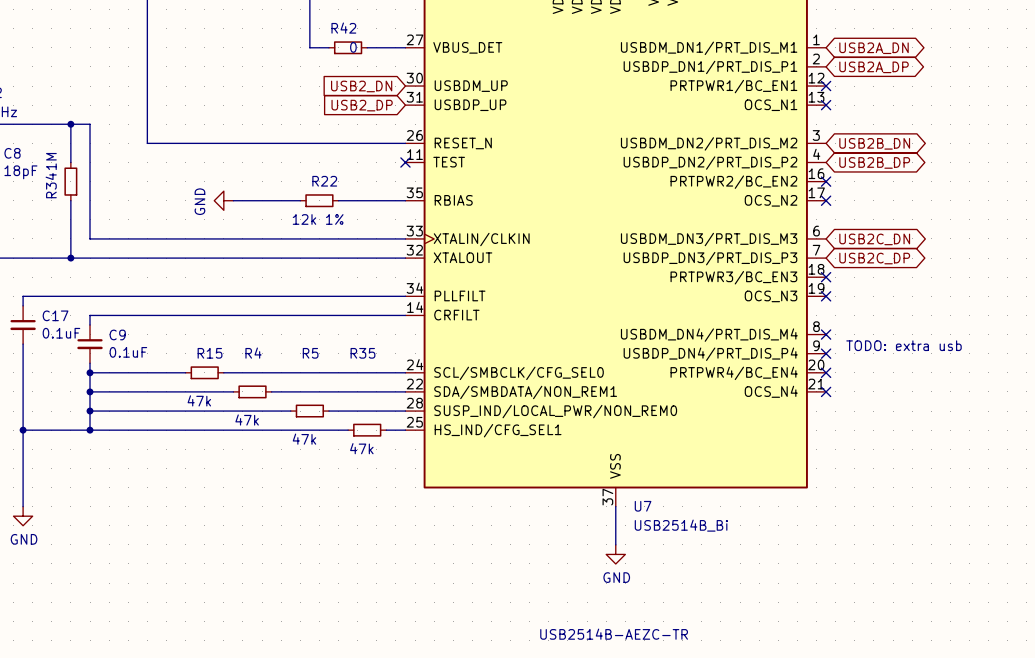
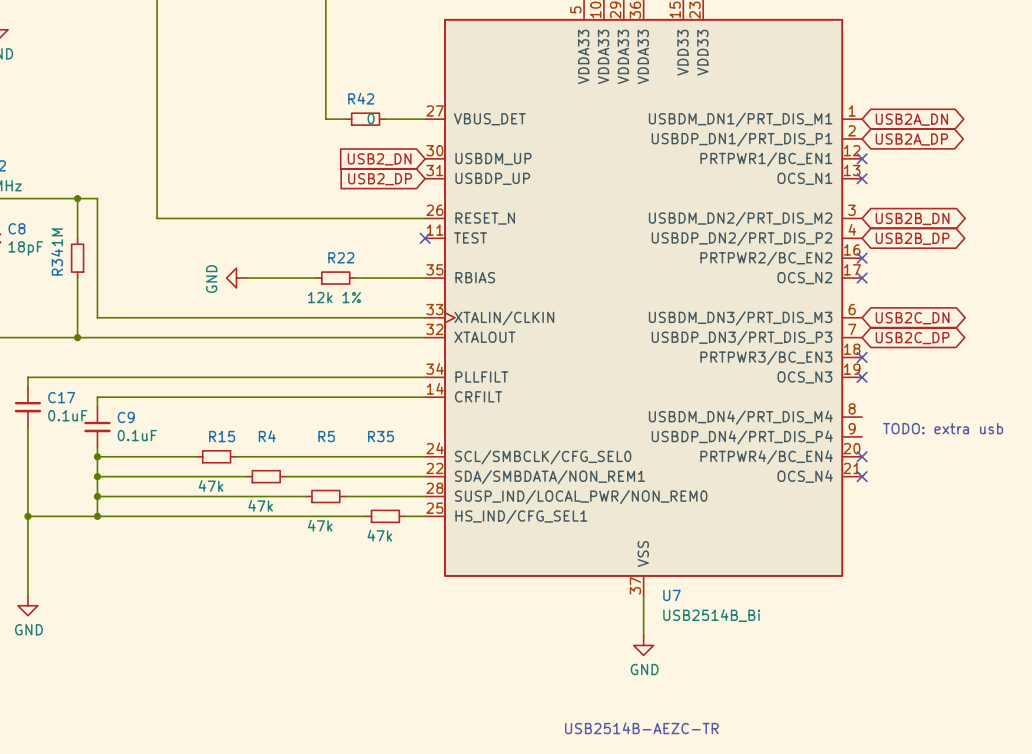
no-connect mark: (826, 334) -> none
no-connect mark: (826, 353) -> none

